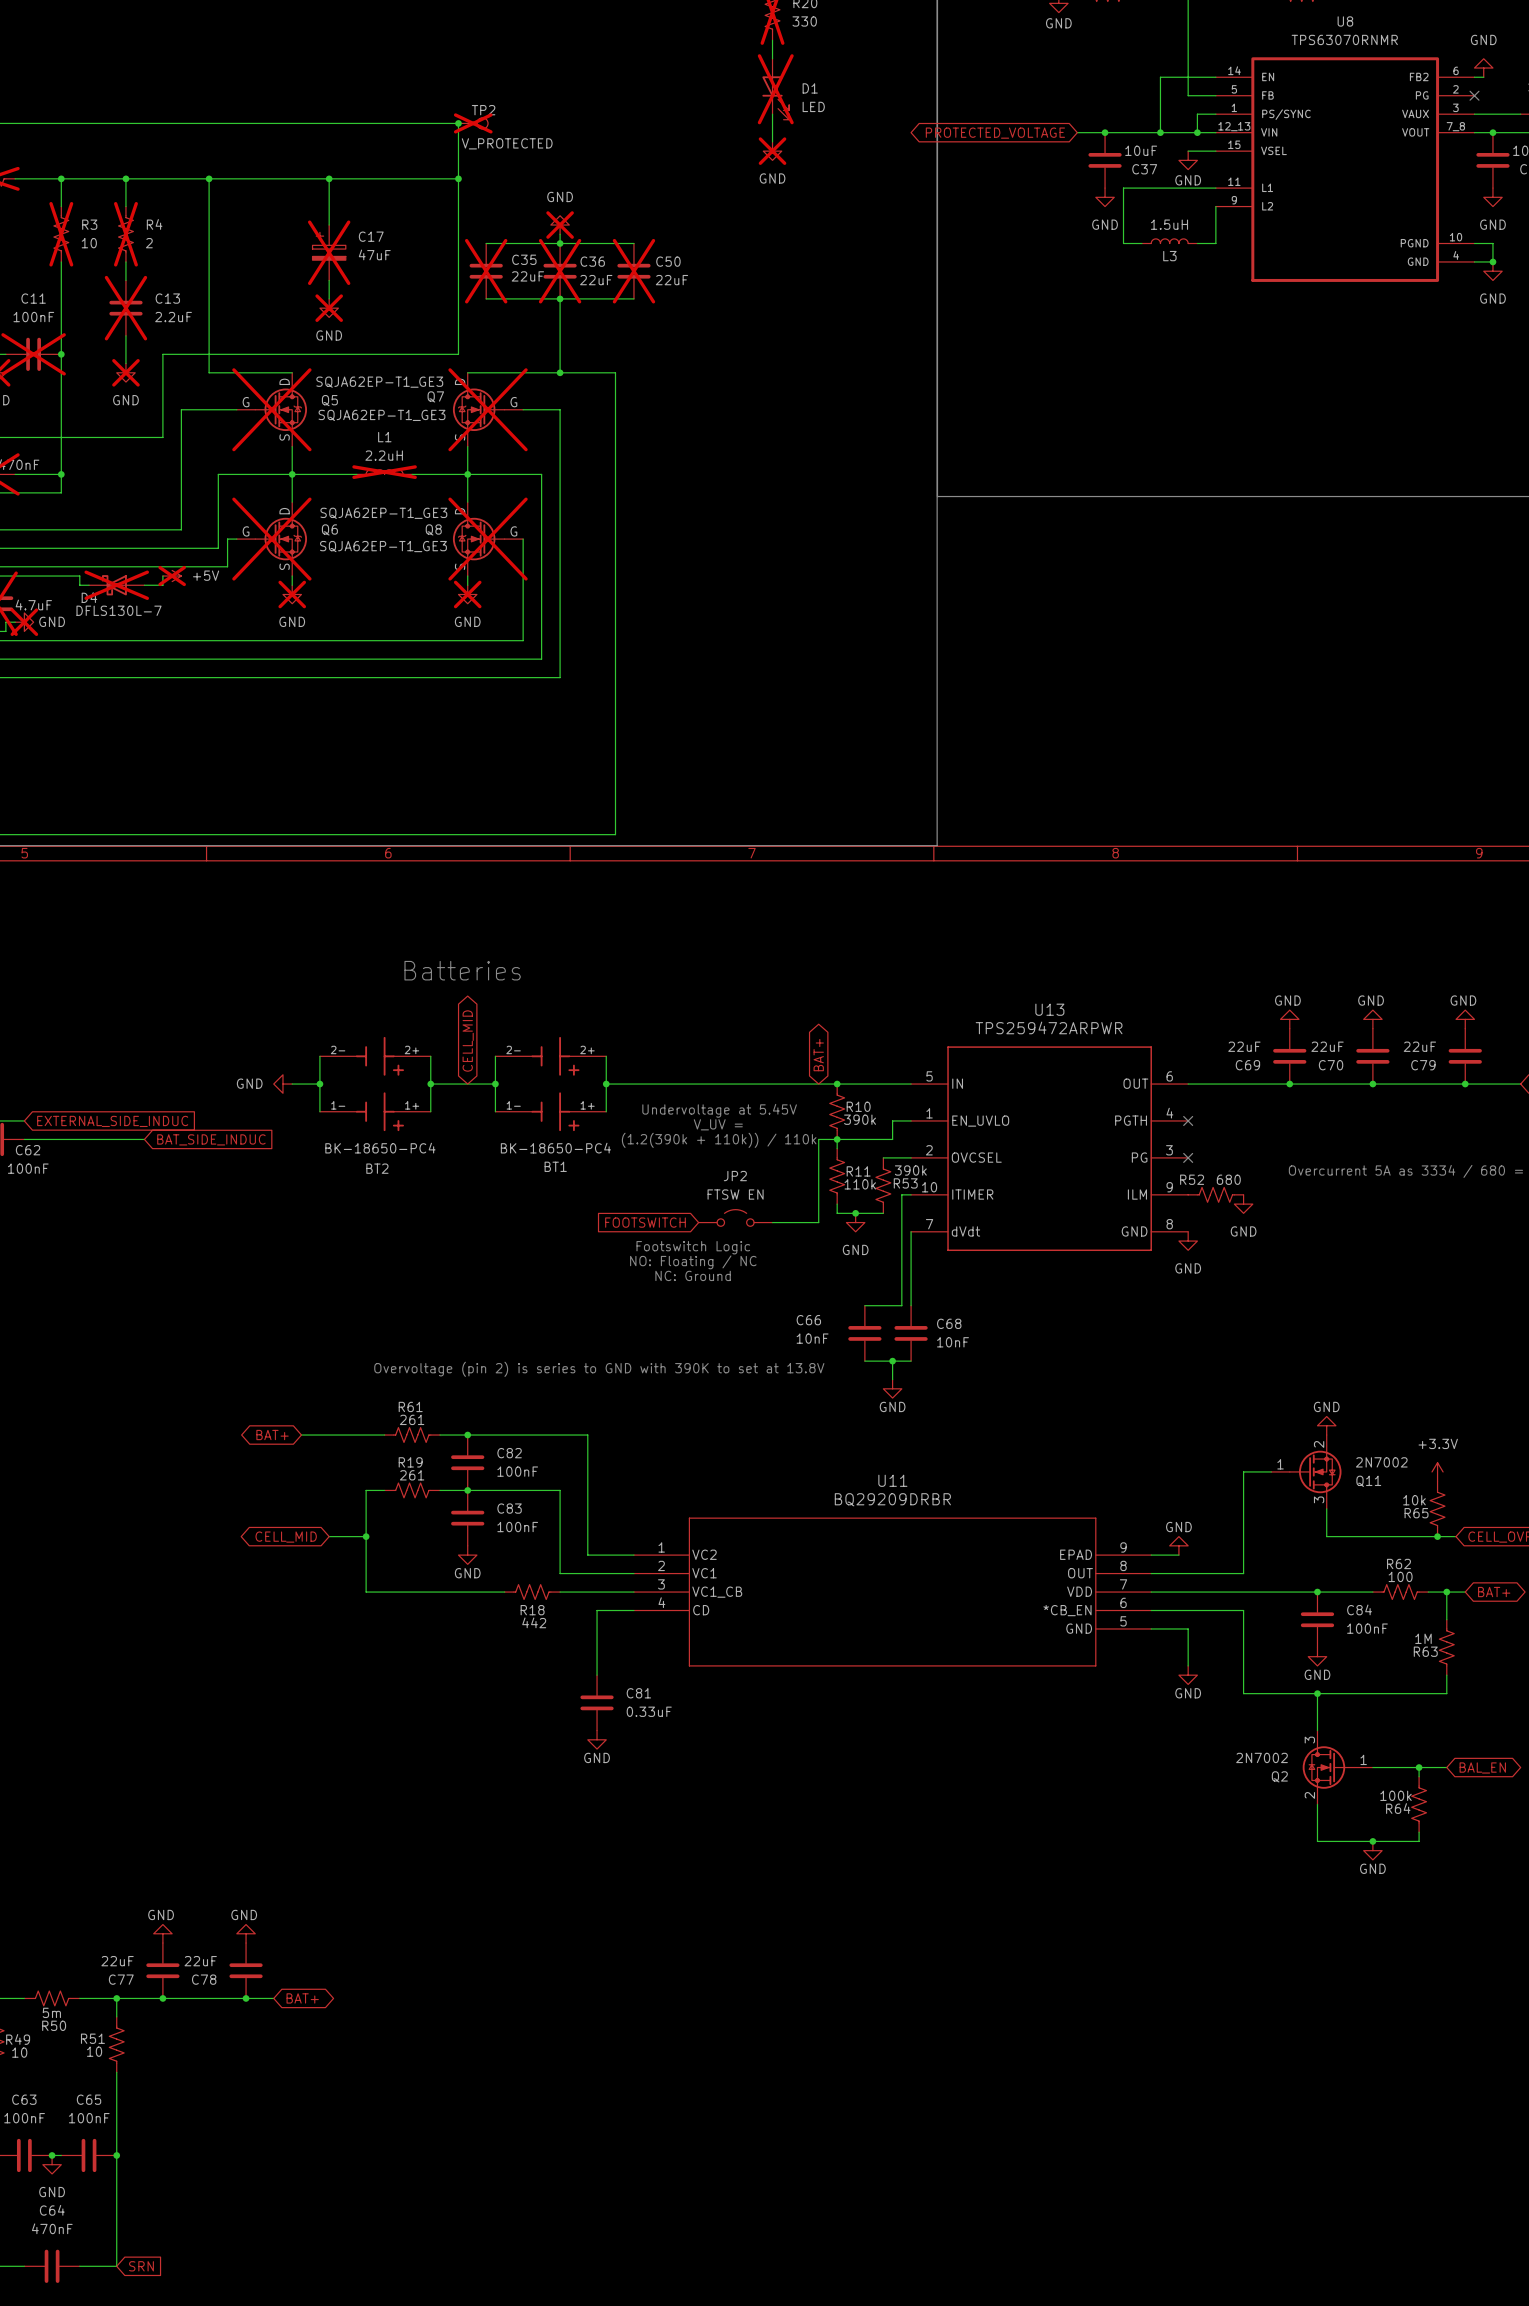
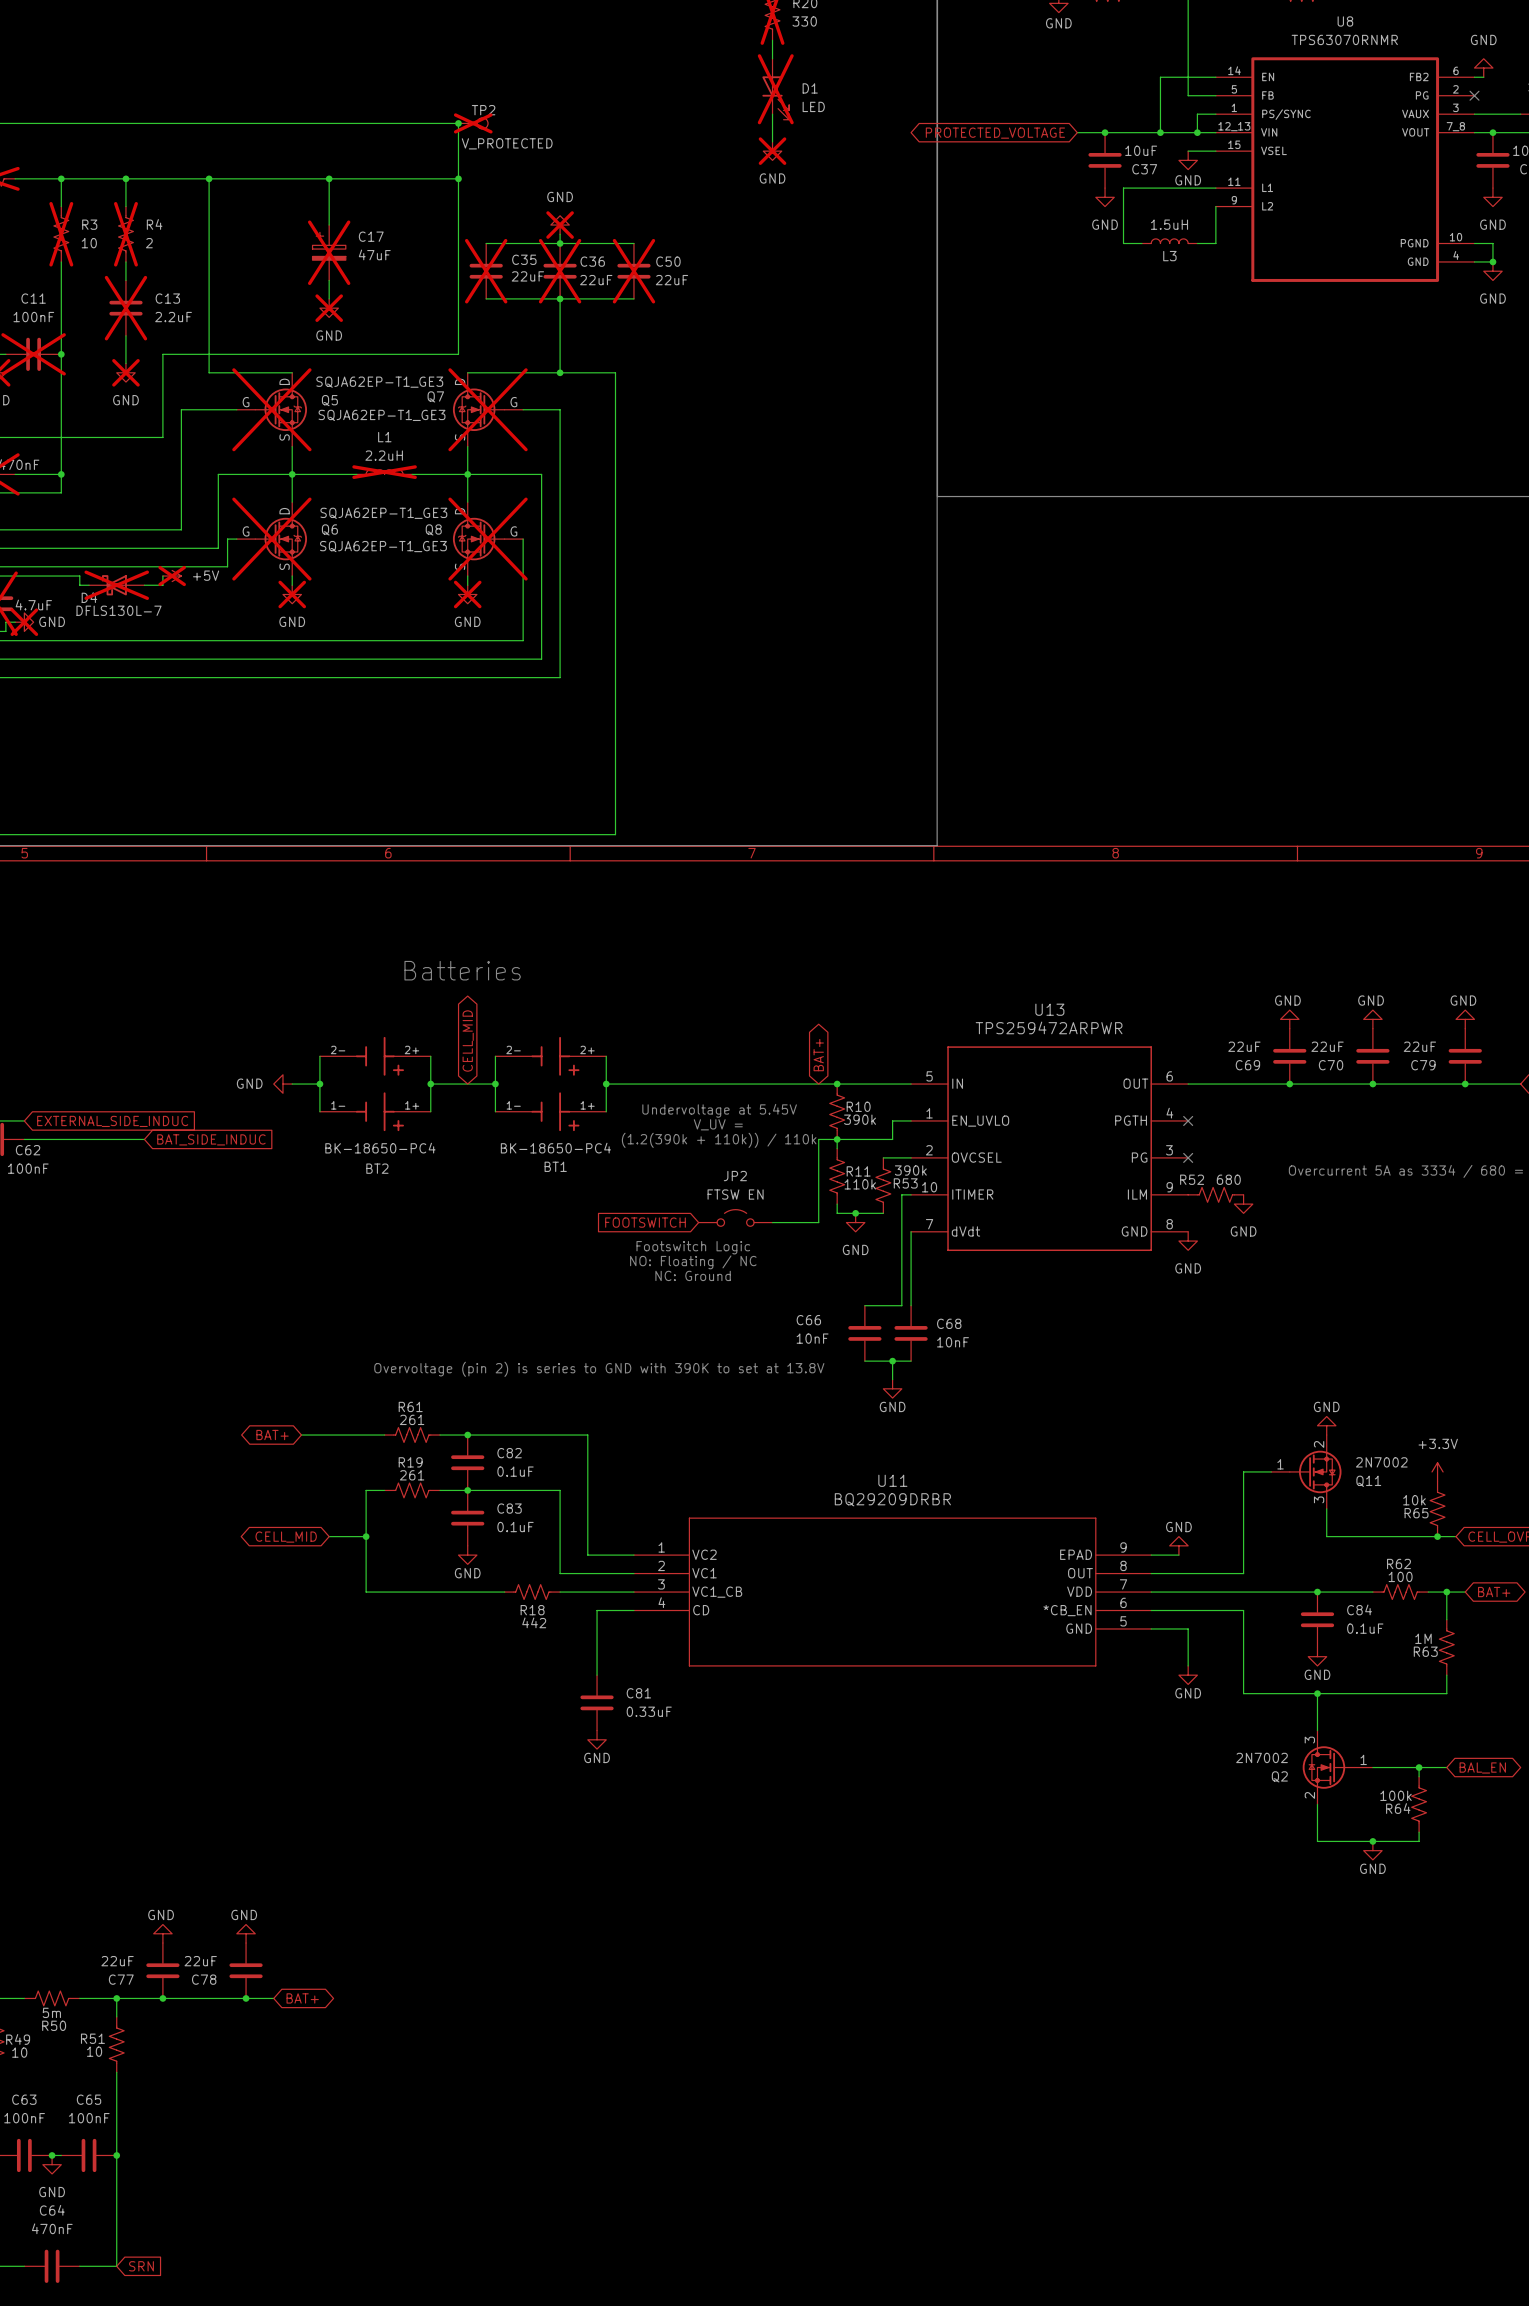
C82 value: 100nF (517, 1471) -> 0.1uF (515, 1471)
C83 value: 100nF (517, 1527) -> 0.1uF (515, 1527)
C84 value: 100nF (1367, 1628) -> 0.1uF (1365, 1628)

